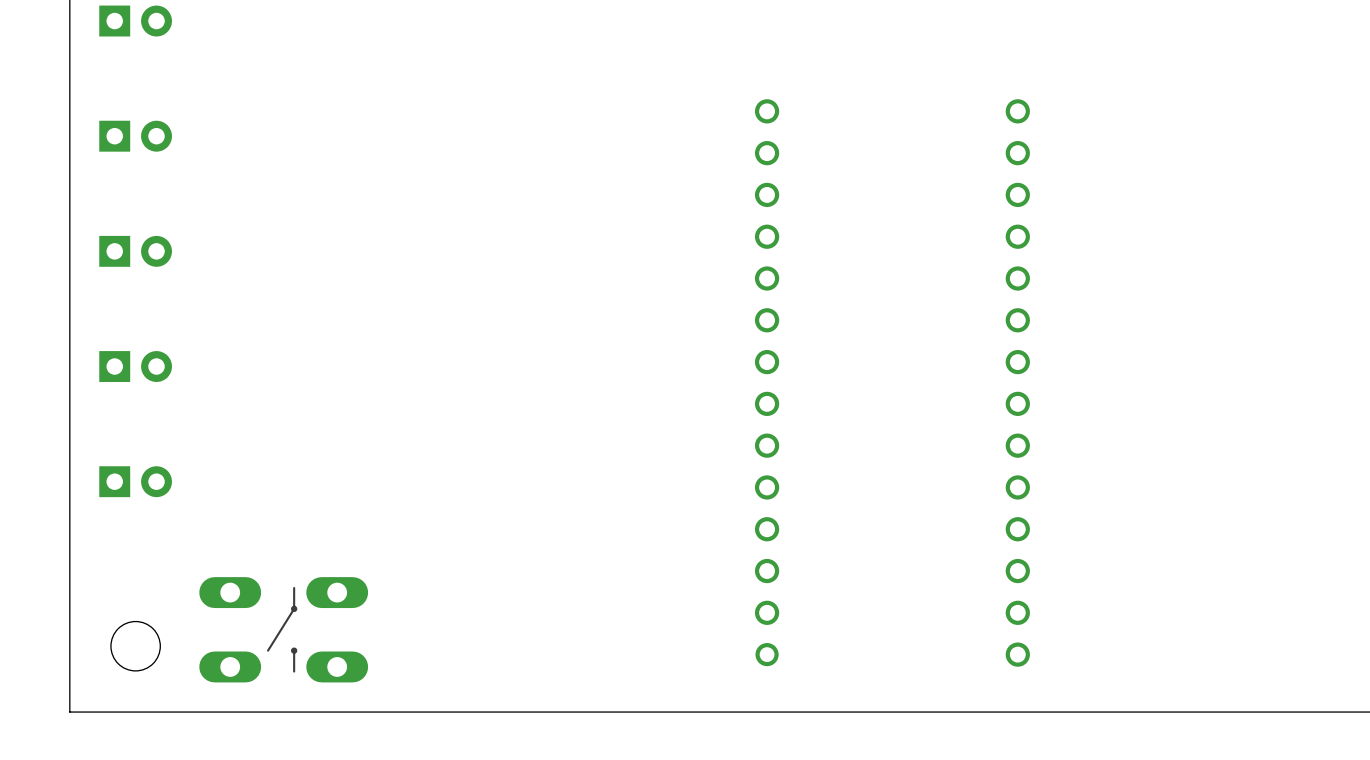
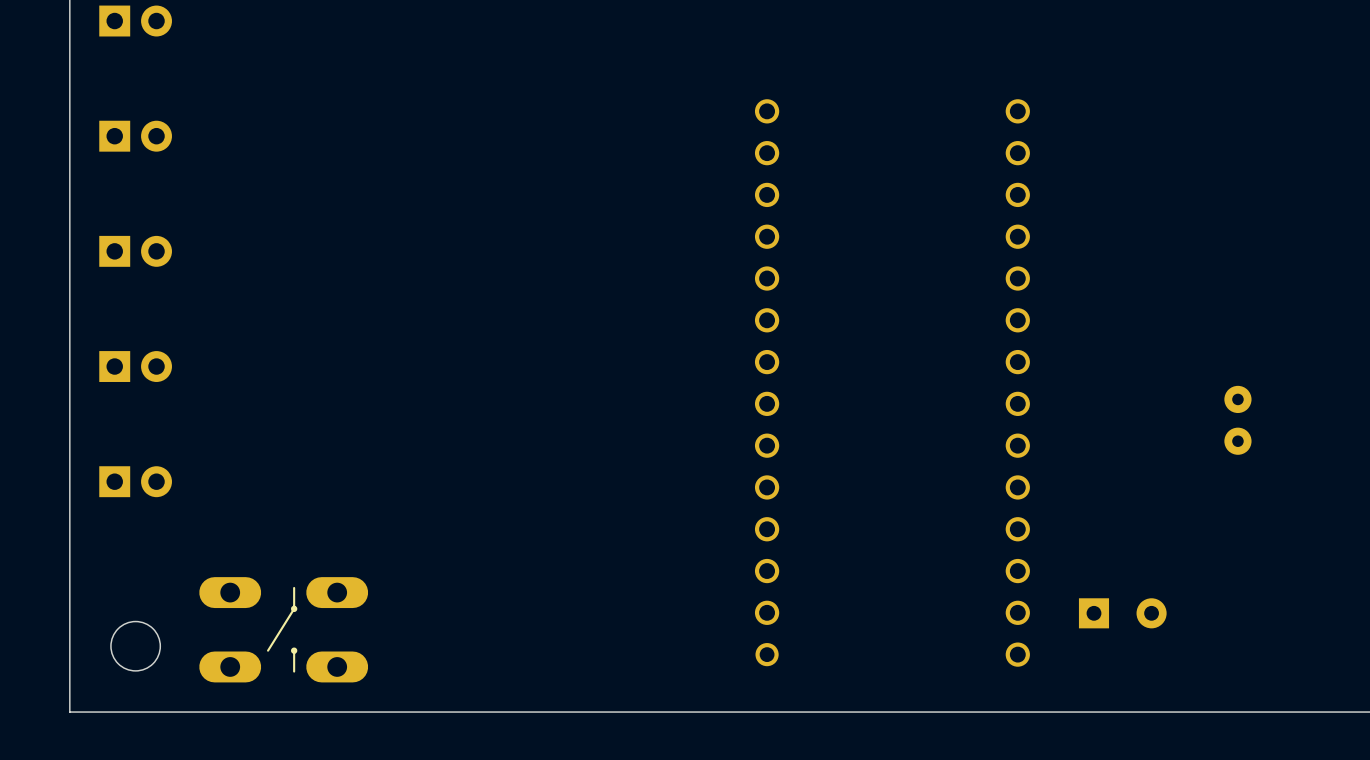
part: none -> (1237, 420)
part: none -> (1122, 613)

